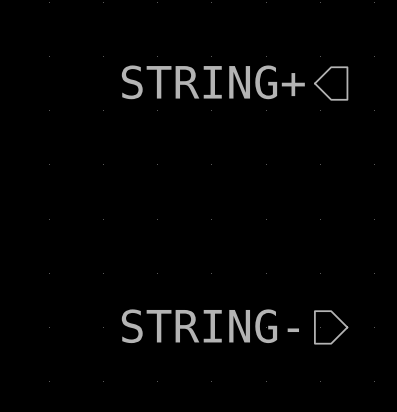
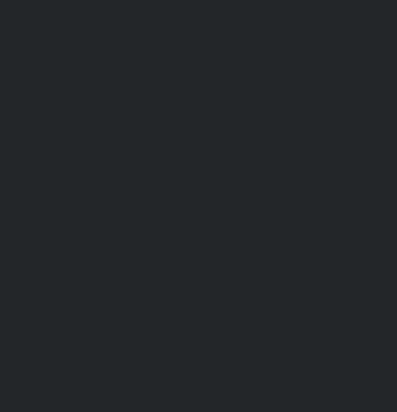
hierarchical label: STRING+ (213, 82) -> none
hierarchical label: STRING- (210, 326) -> none

